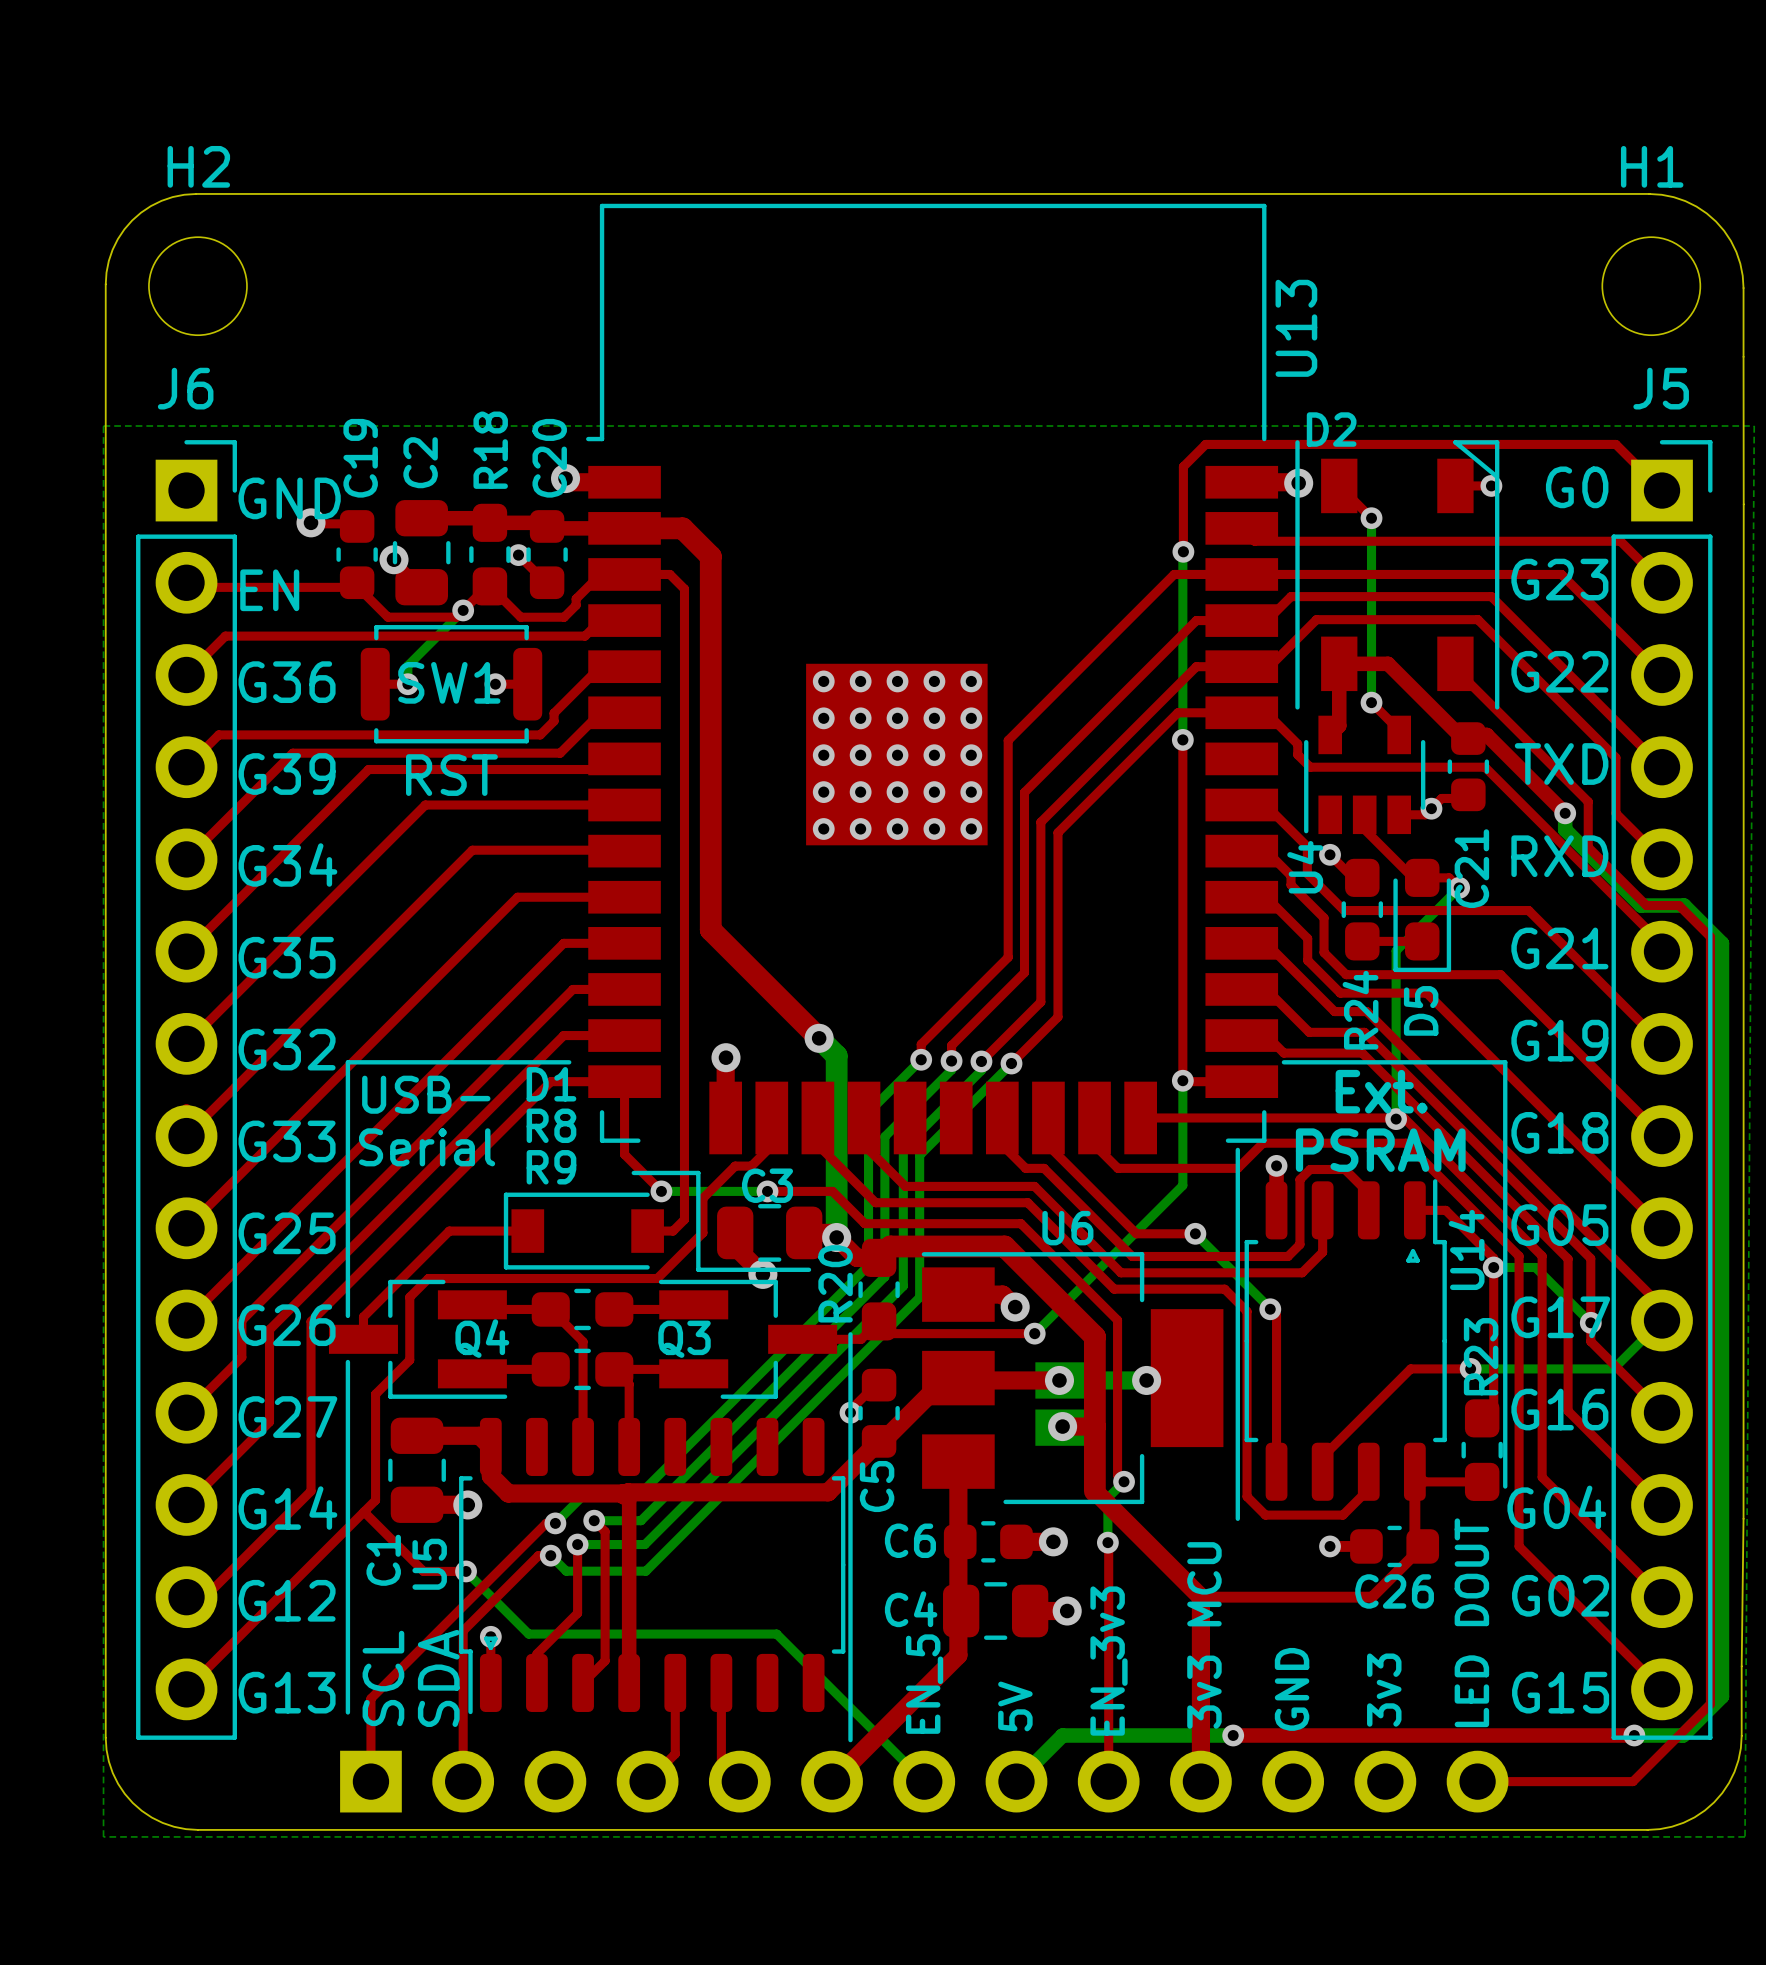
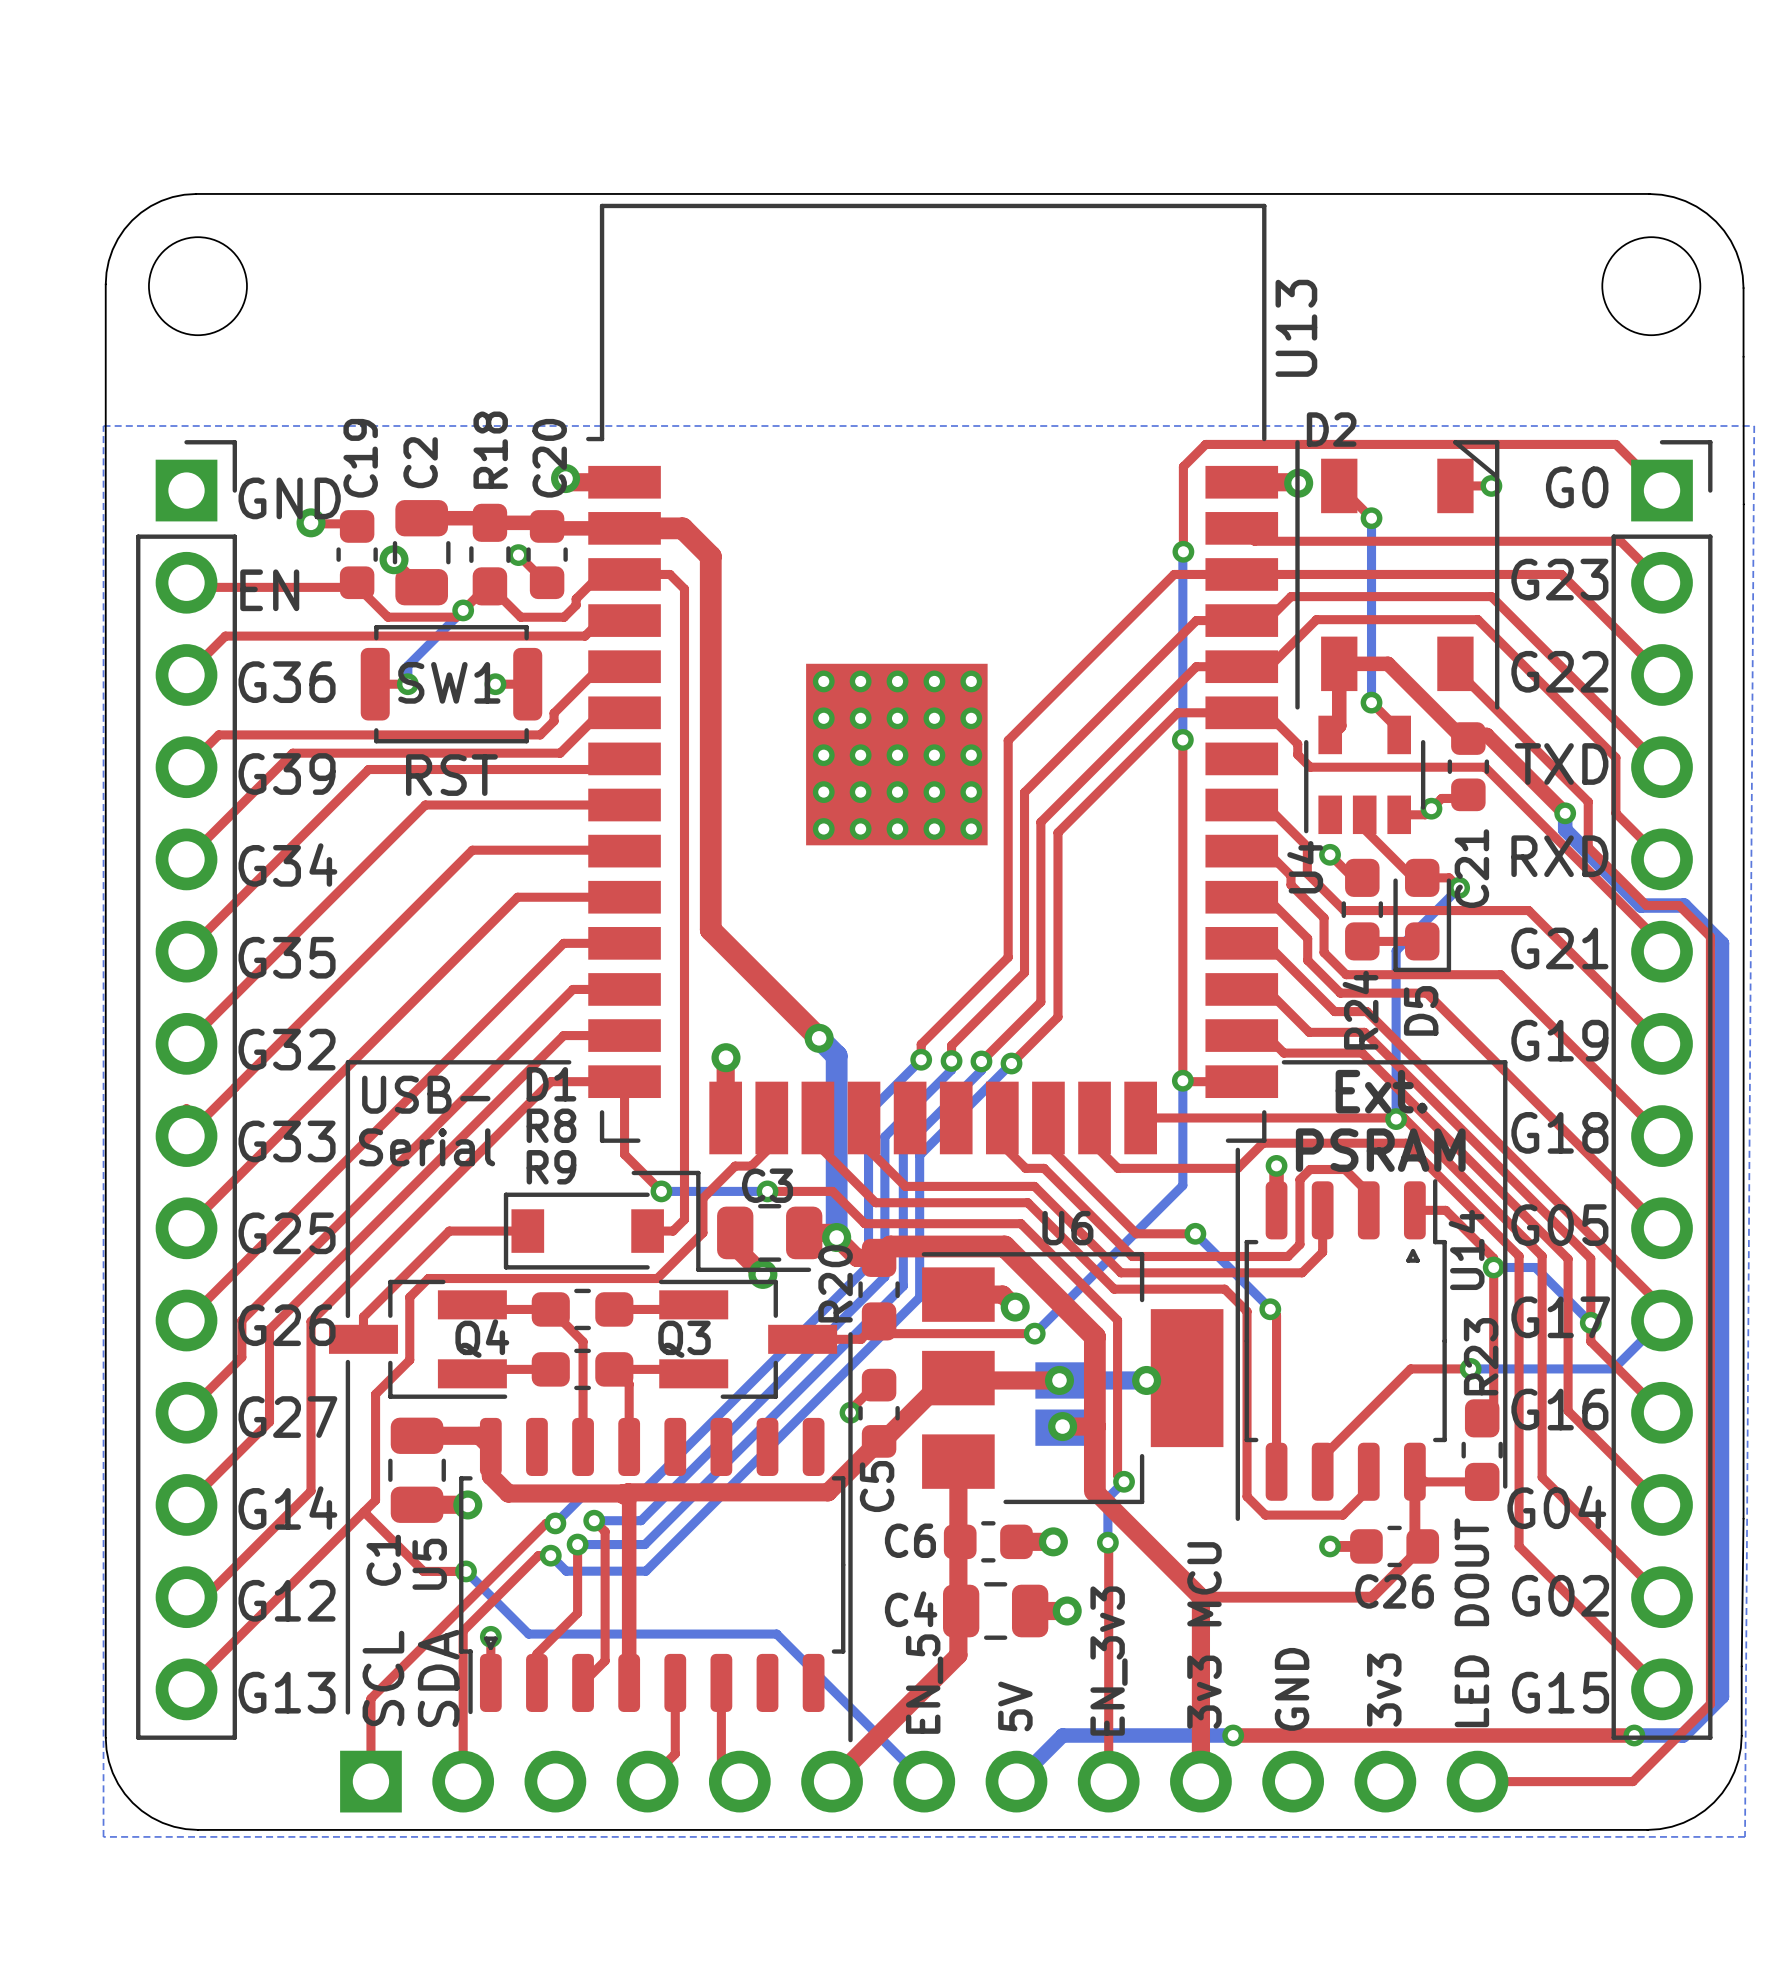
H2 name: H2 (198, 166) -> none
H1 name: H1 (1652, 166) -> none
J6 name: J6 (185, 388) -> none
J5 name: J5 (1661, 388) -> none

